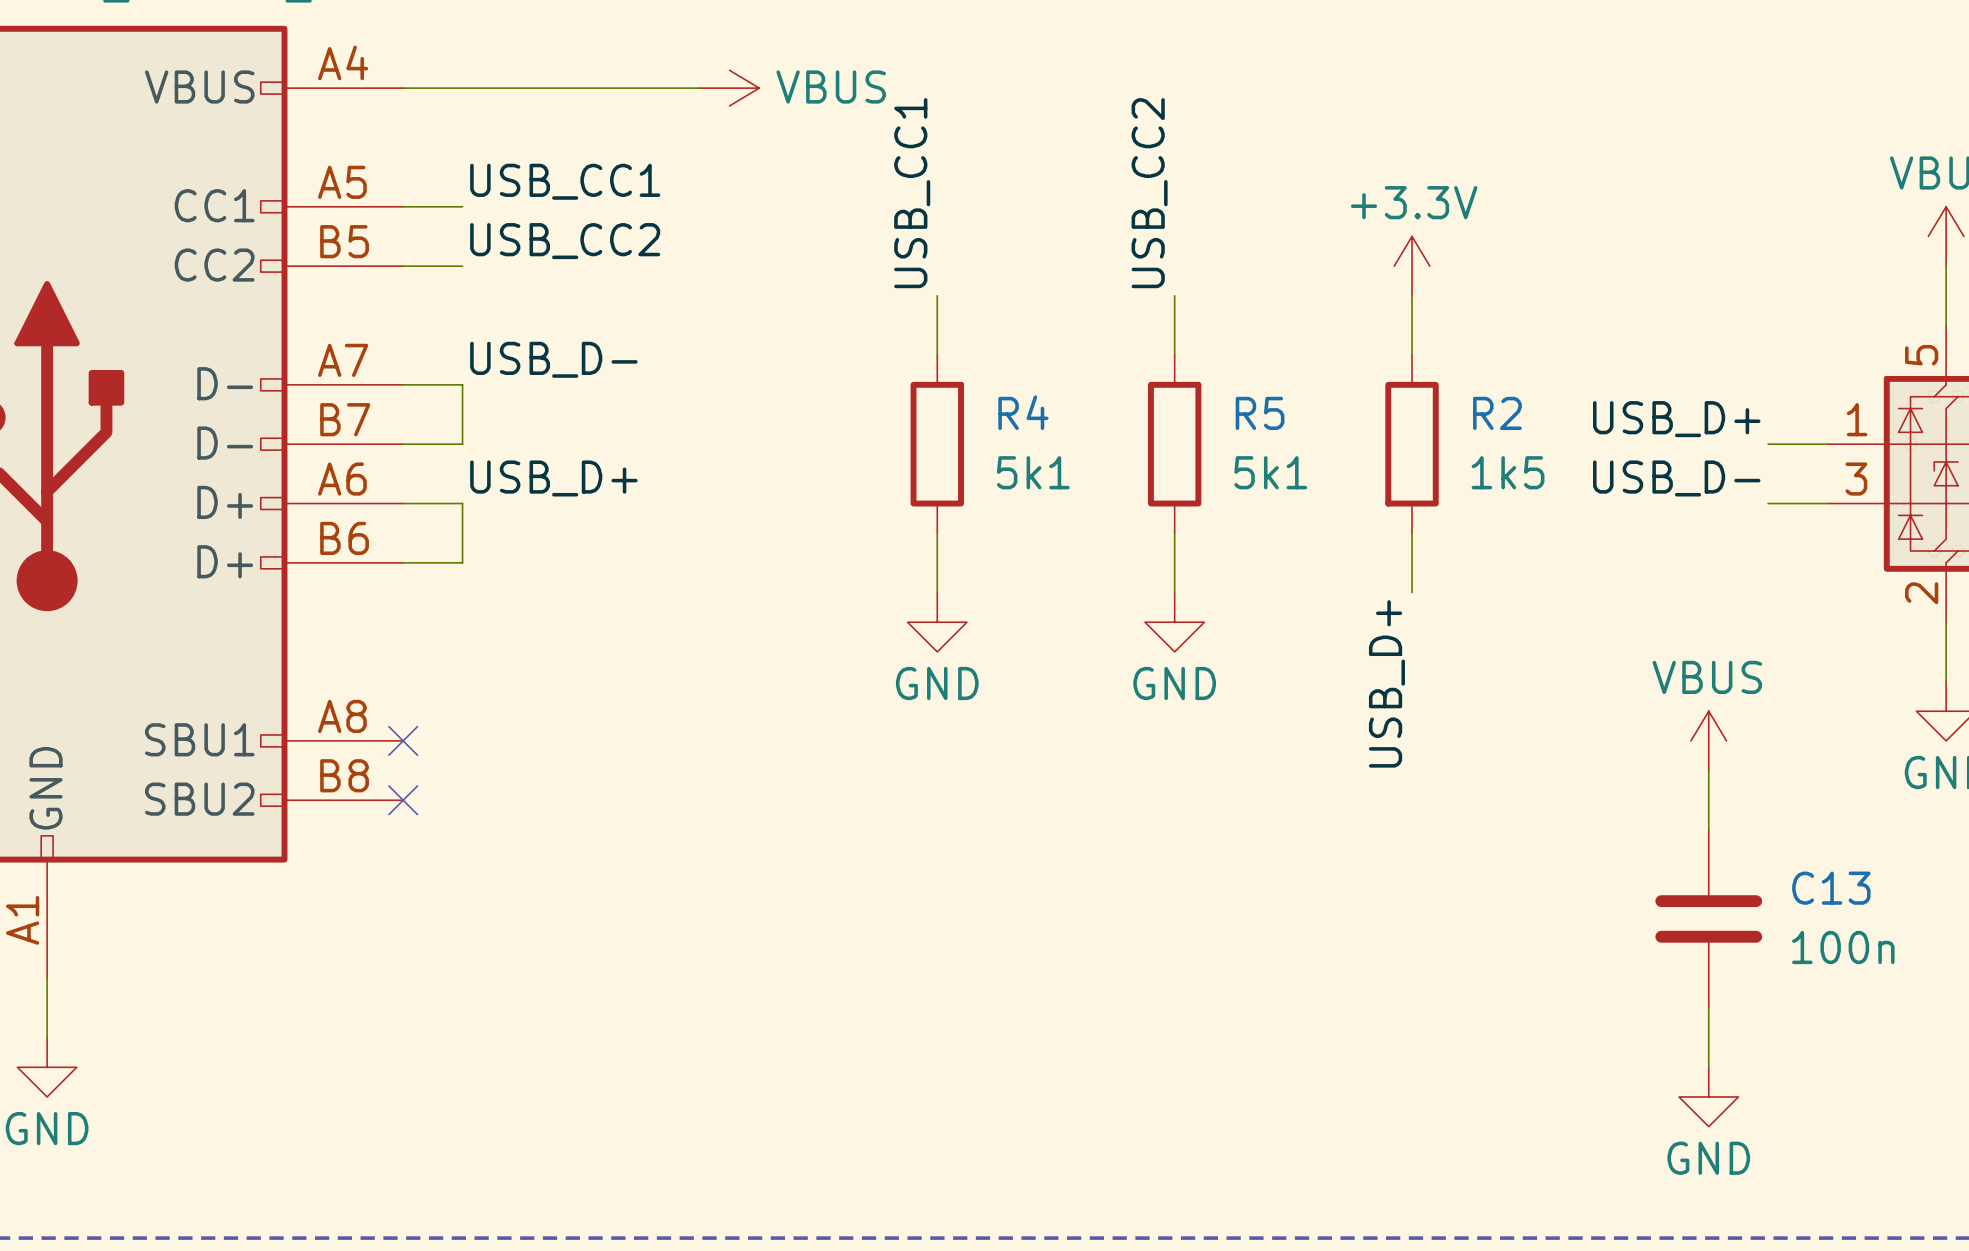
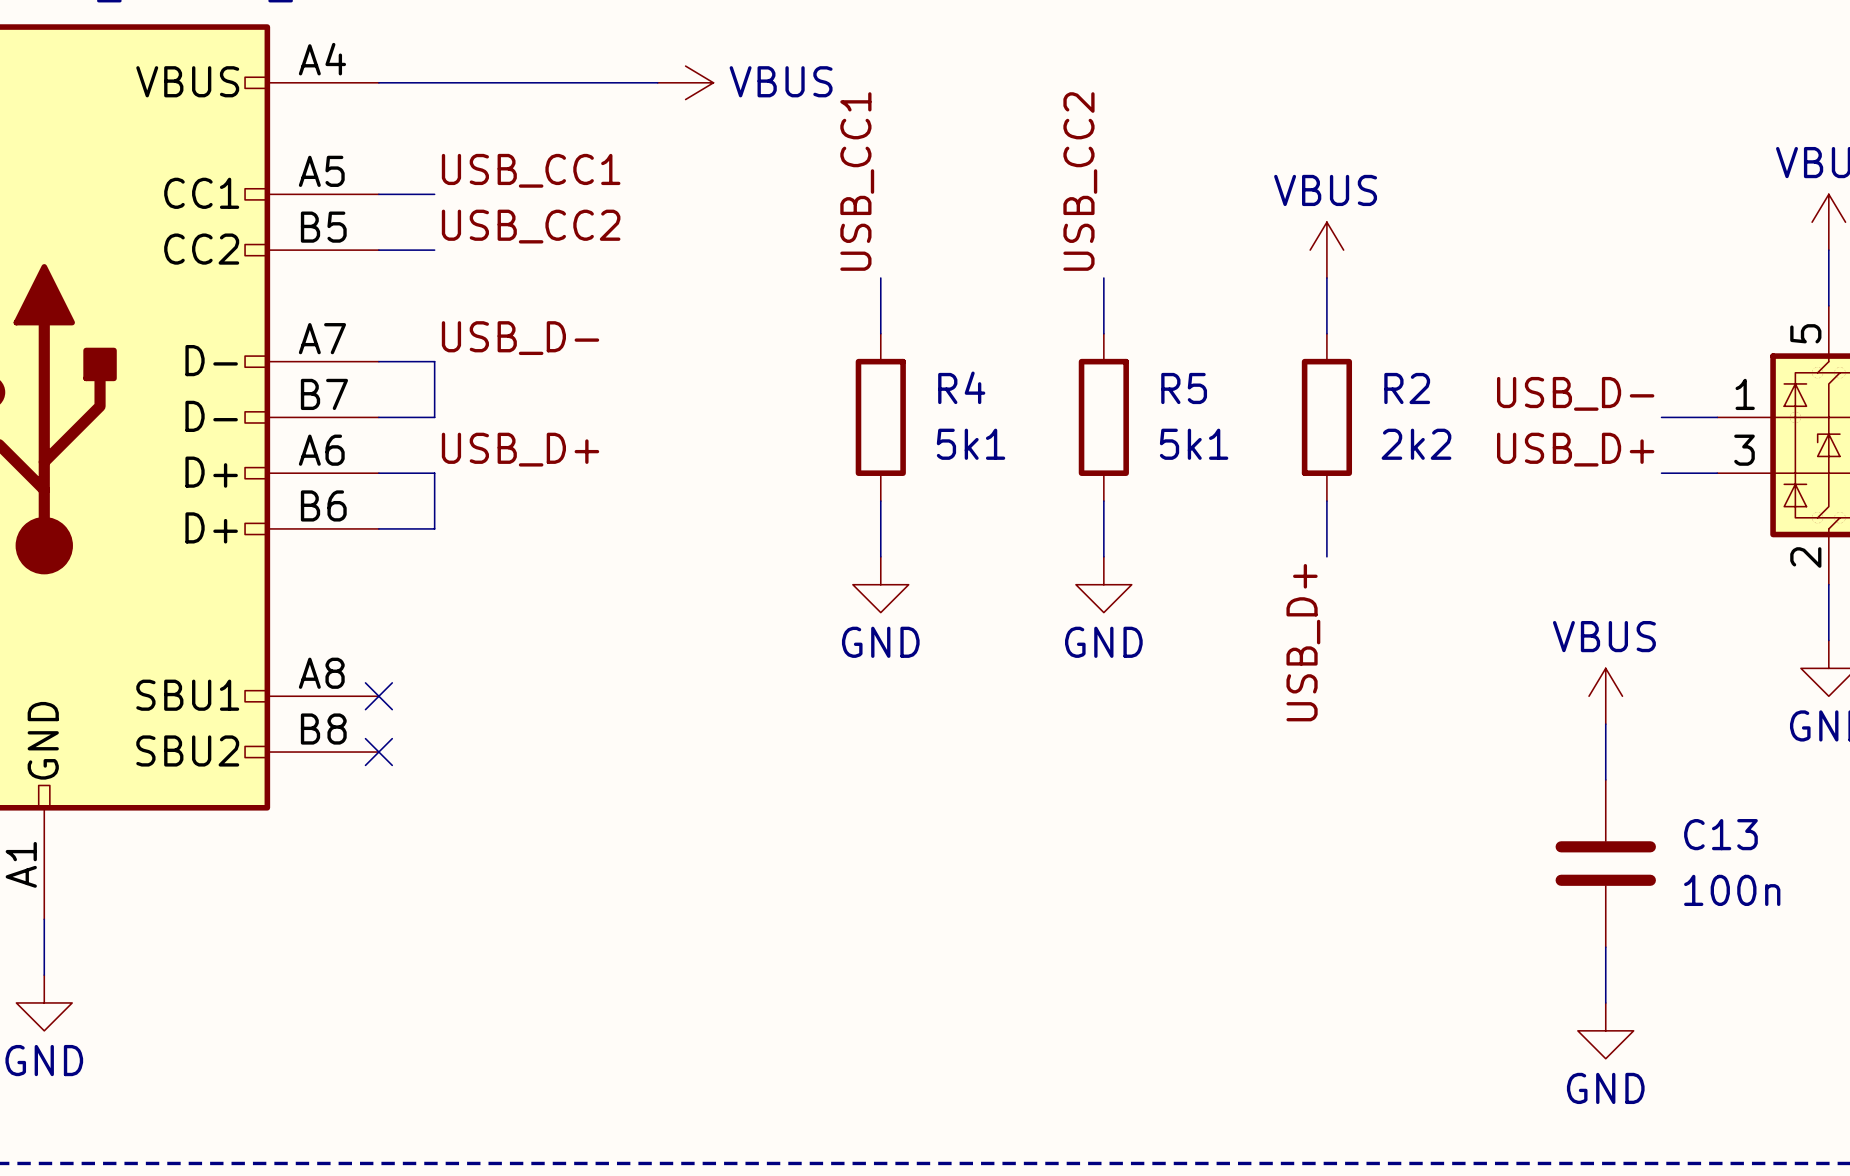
power symbol: +3.3V (1412, 266) -> VBUS (1326, 250)
label: USB_D+ (1676, 419) -> USB_D- (1575, 393)
R2 value: 1k5 (1508, 472) -> 2k2 (1416, 444)
label: USB_D- (1676, 478) -> USB_D+ (1575, 449)

